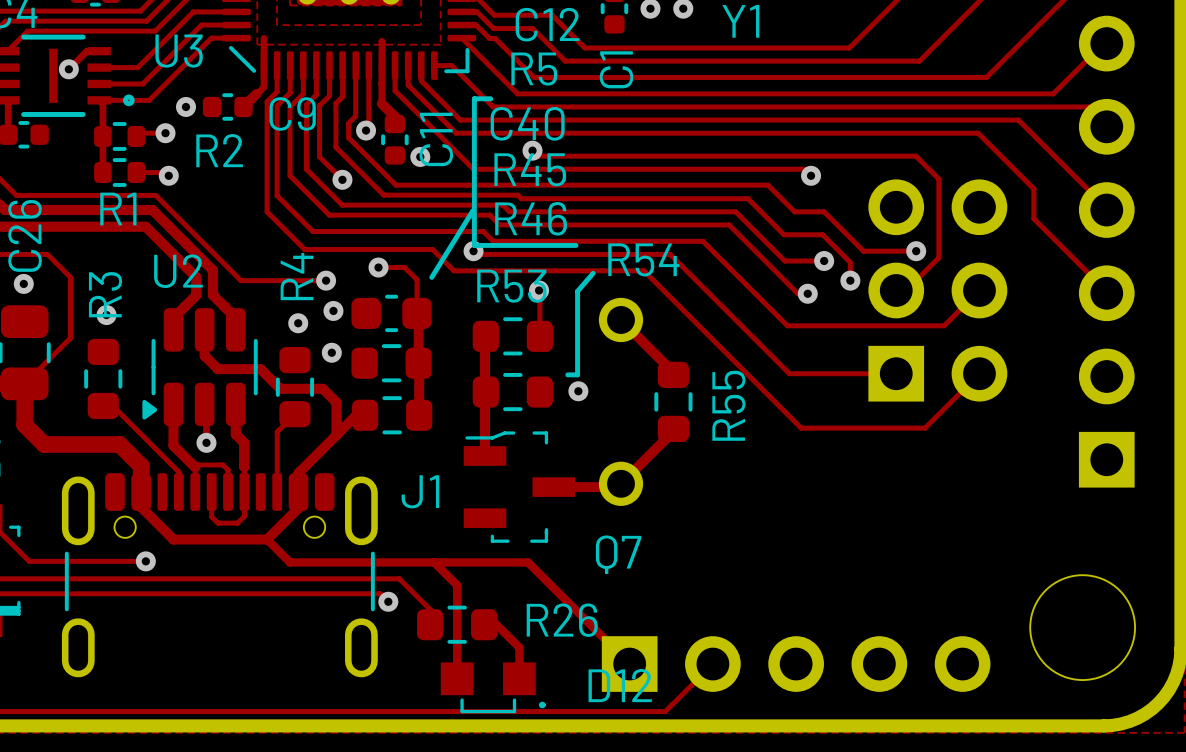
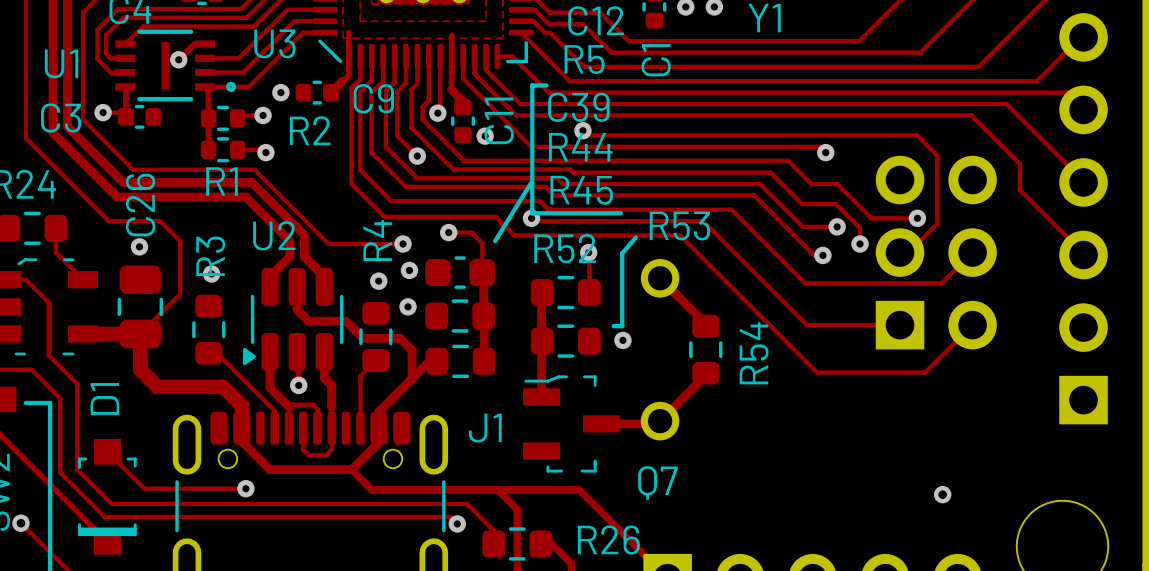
C40 name: C40 (527, 123) -> C39 (578, 107)
R45 name: R45 (530, 169) -> R44 (580, 147)
R46 name: R46 (531, 218) -> R45 (581, 190)
R54 name: R54 (643, 259) -> R53 (679, 225)
R53 name: R53 (511, 286) -> R52 (565, 248)
R55 name: R55 (728, 405) -> R54 (754, 353)
via: none -> (942, 494)

